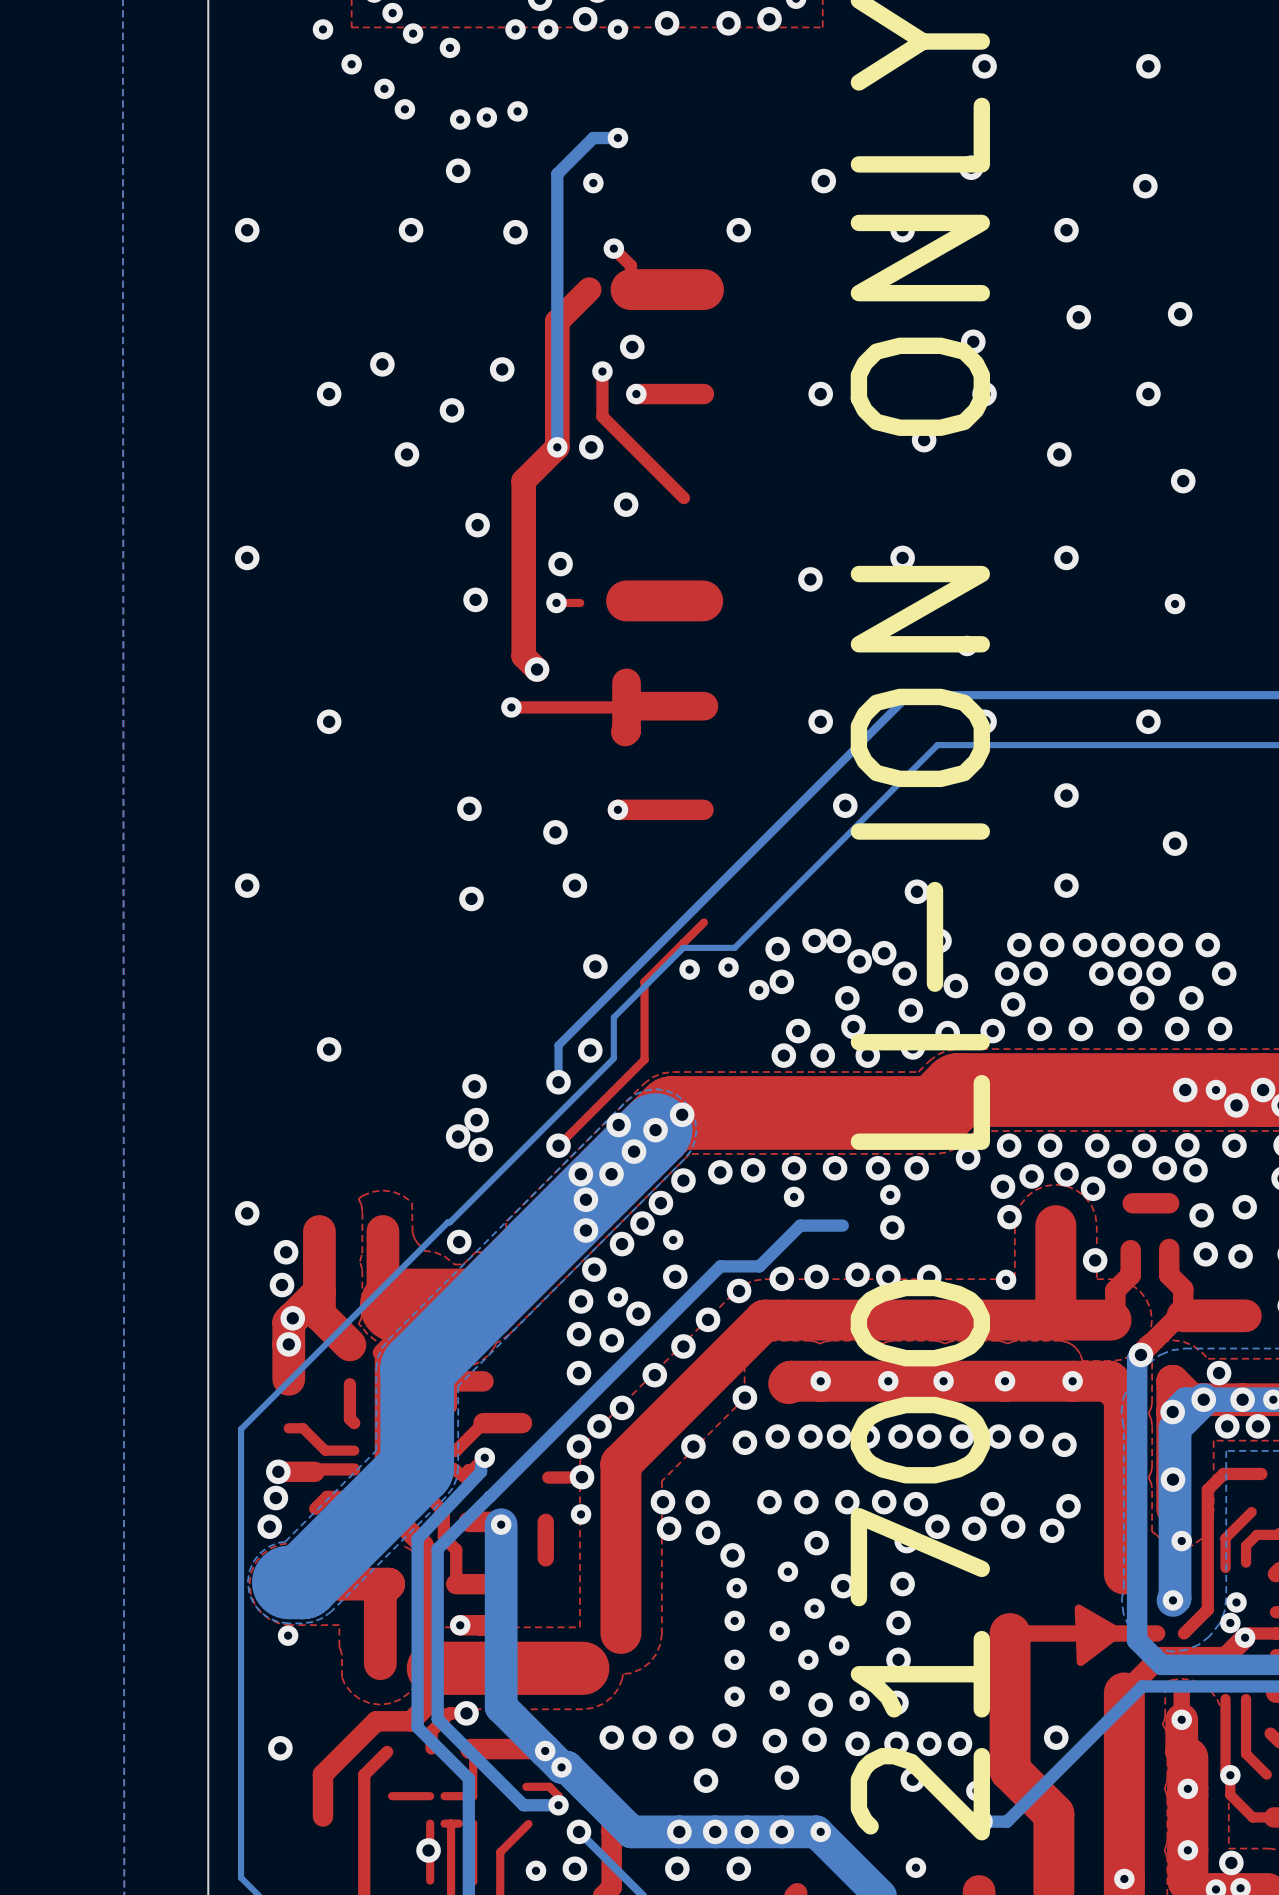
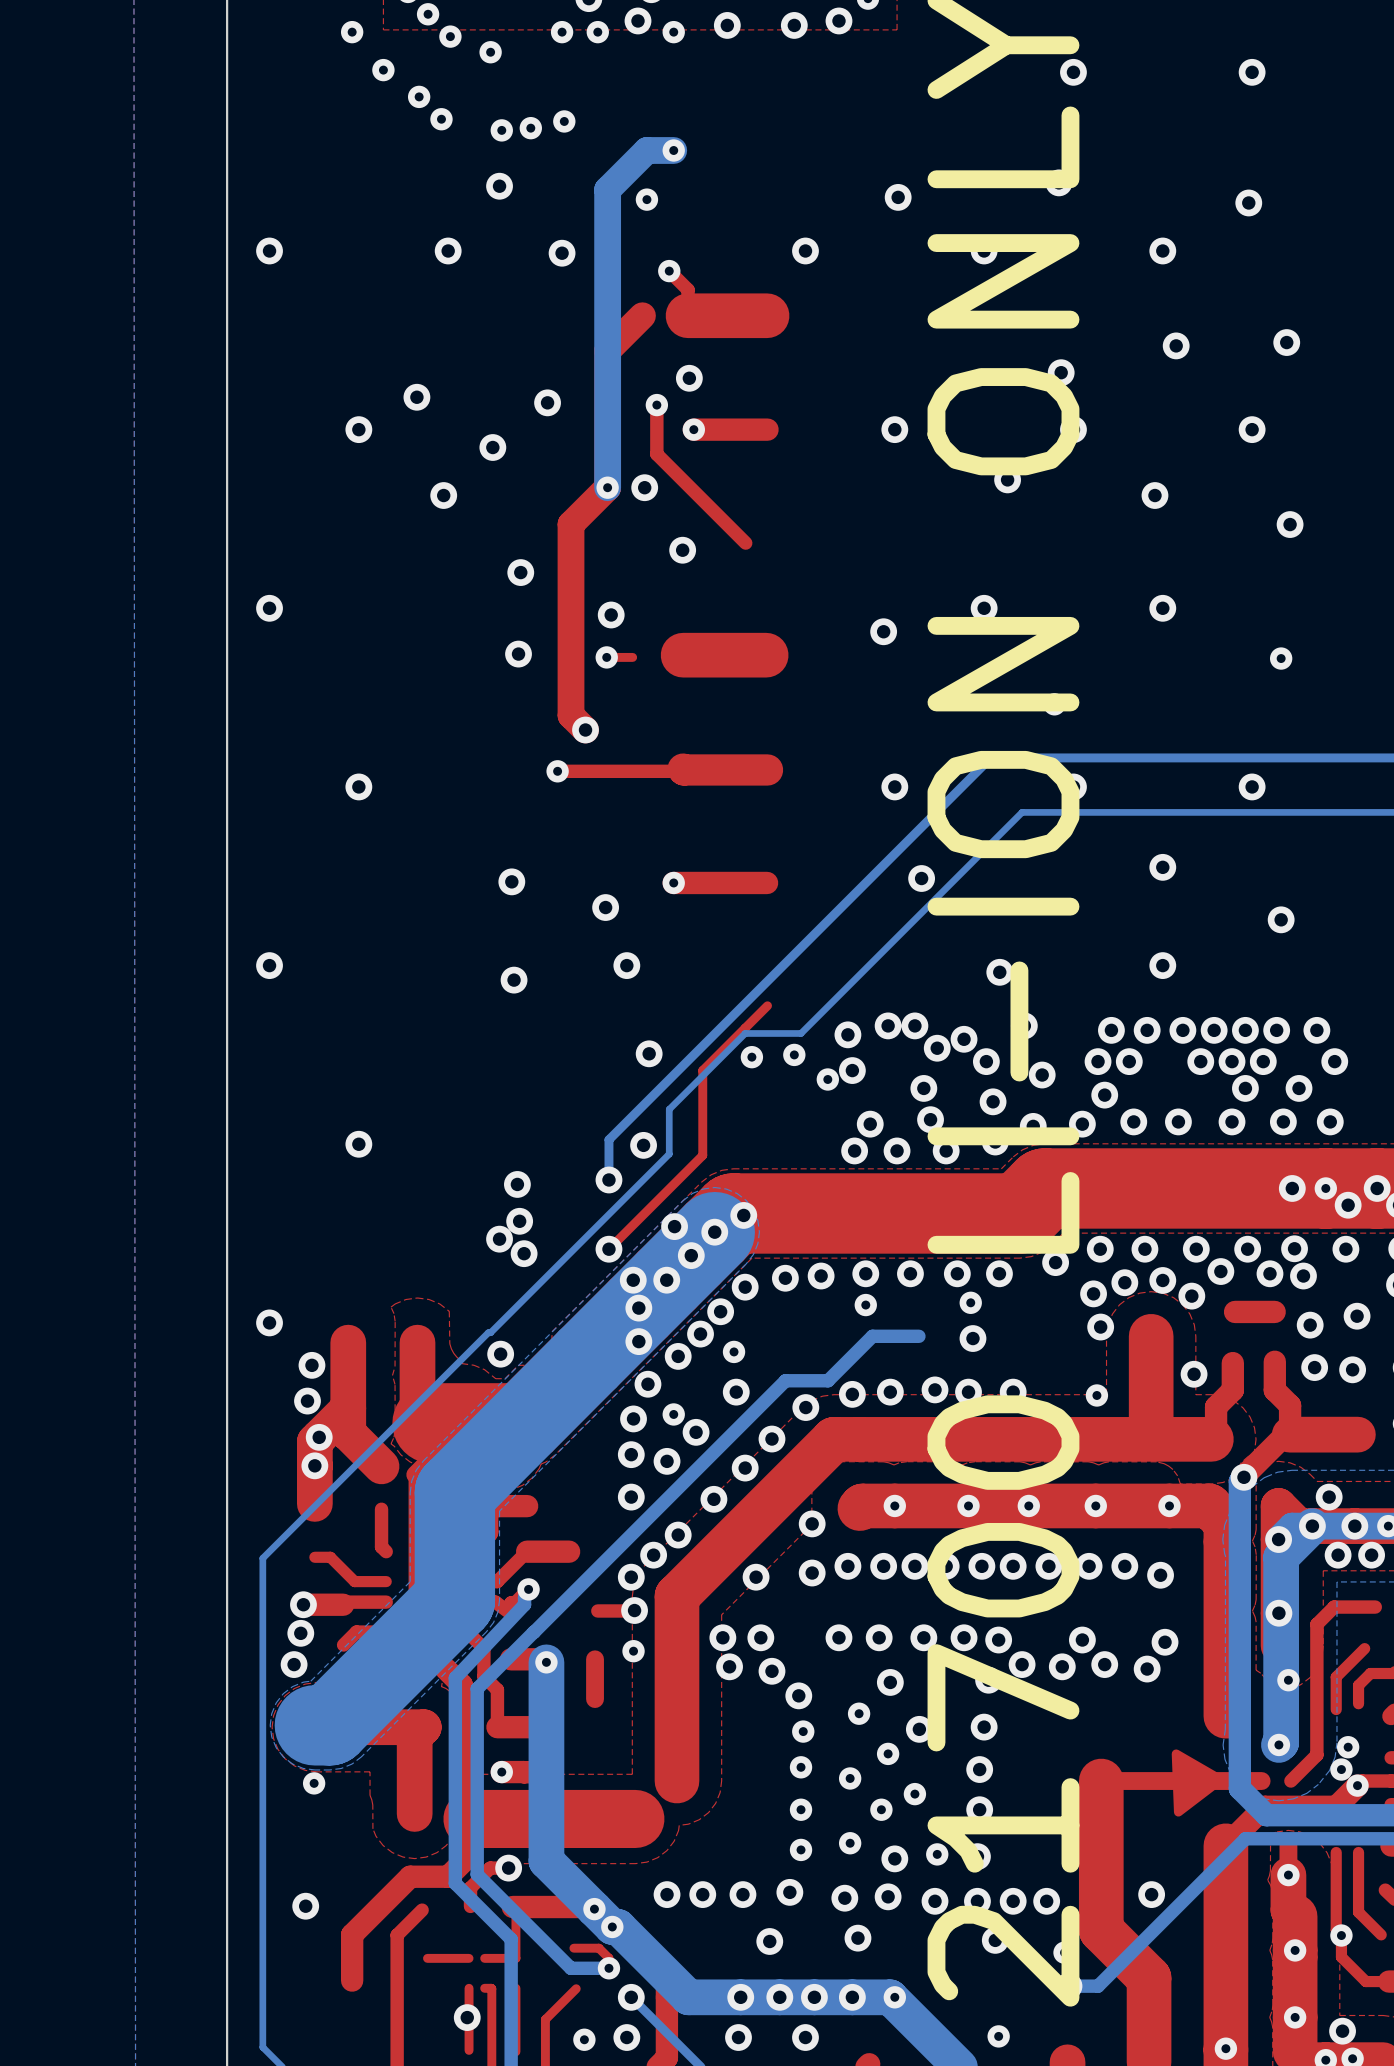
bottom track width: thin (617, 138) (593, 138) (557, 174) (557, 447) -> thick (673, 150) (646, 150) (607, 189) (607, 487)
top track: (626, 682) (625, 732) -> none
top track: (458, 1823) (450, 1823) -> none

